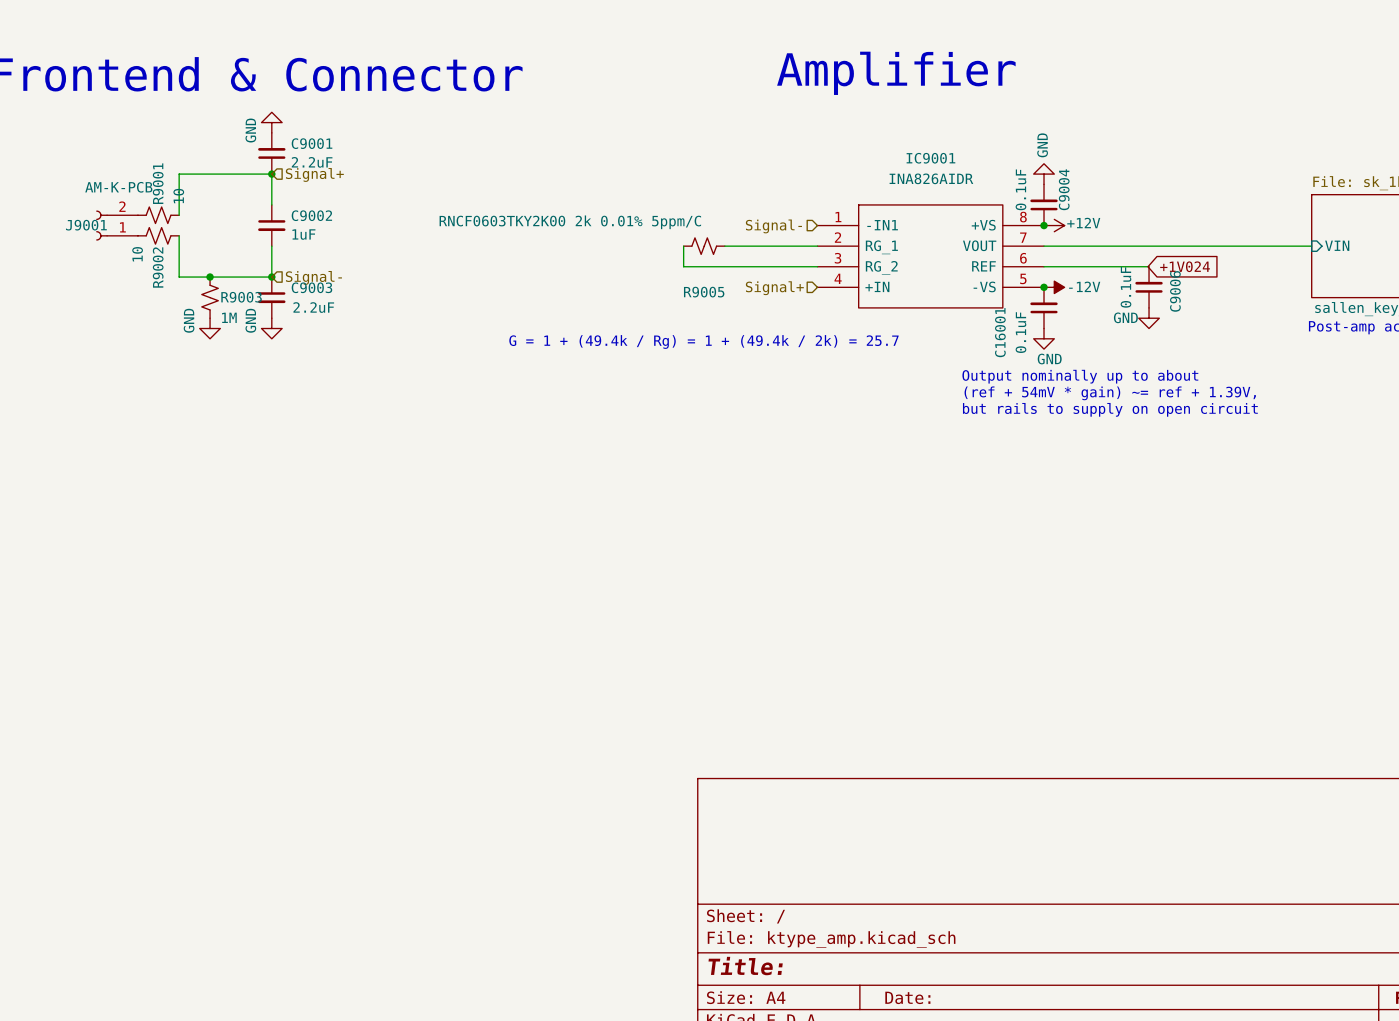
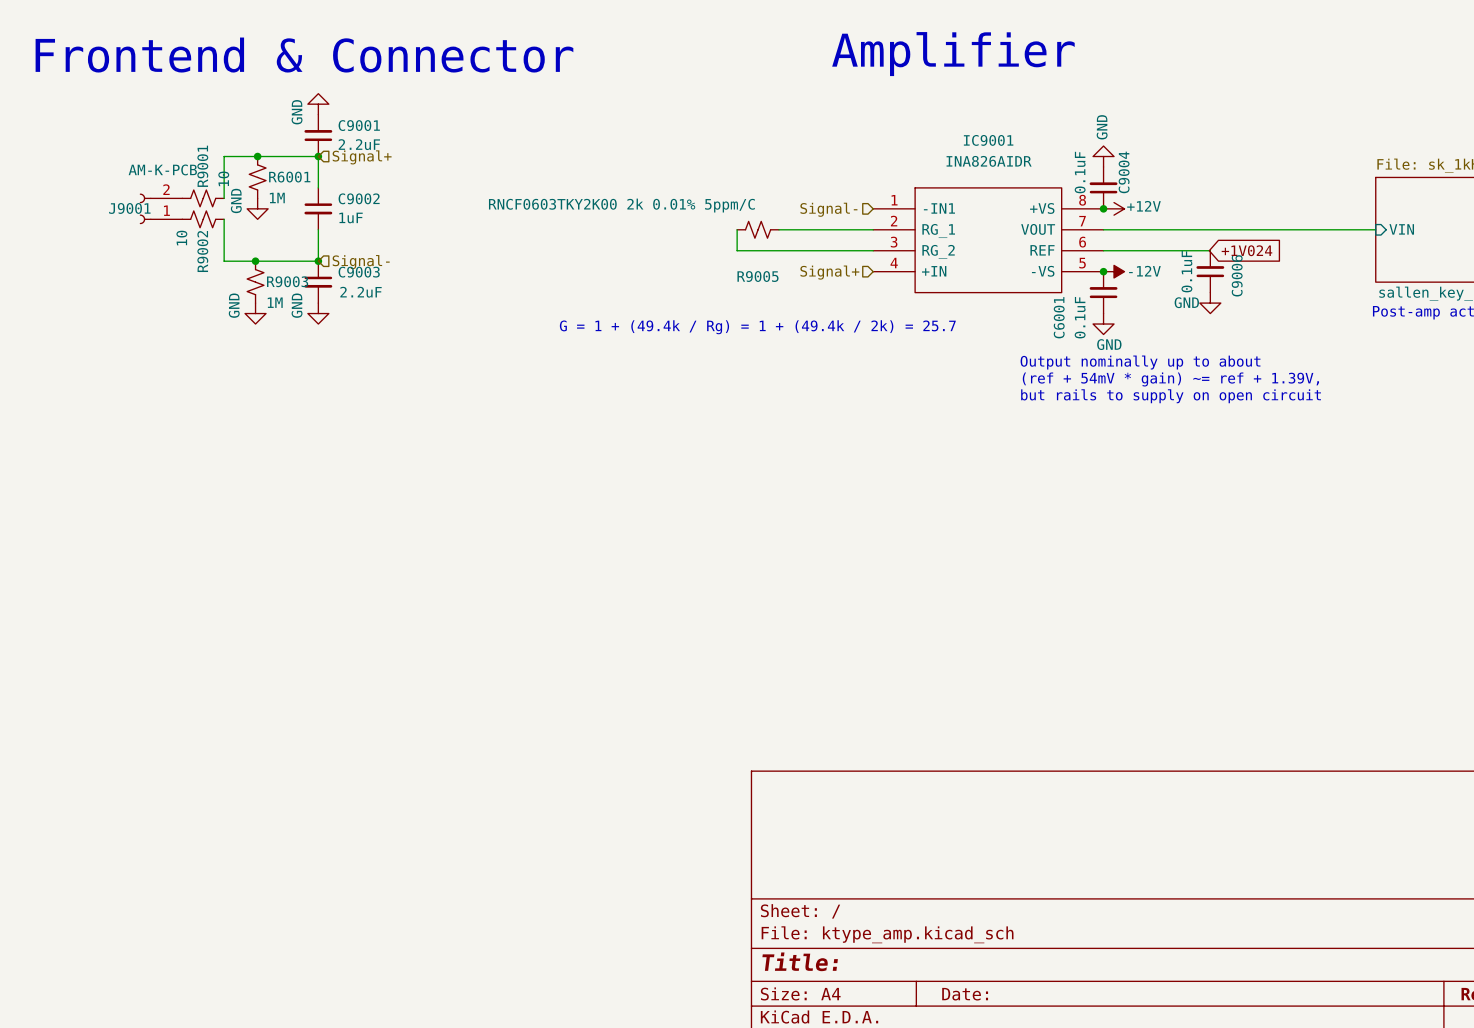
junction: none -> (257, 156)
R6001: none -> 1M (257, 177)
power symbol: none -> GND (257, 208)
C16001 name: C16001 (1000, 332) -> C6001 (1059, 317)

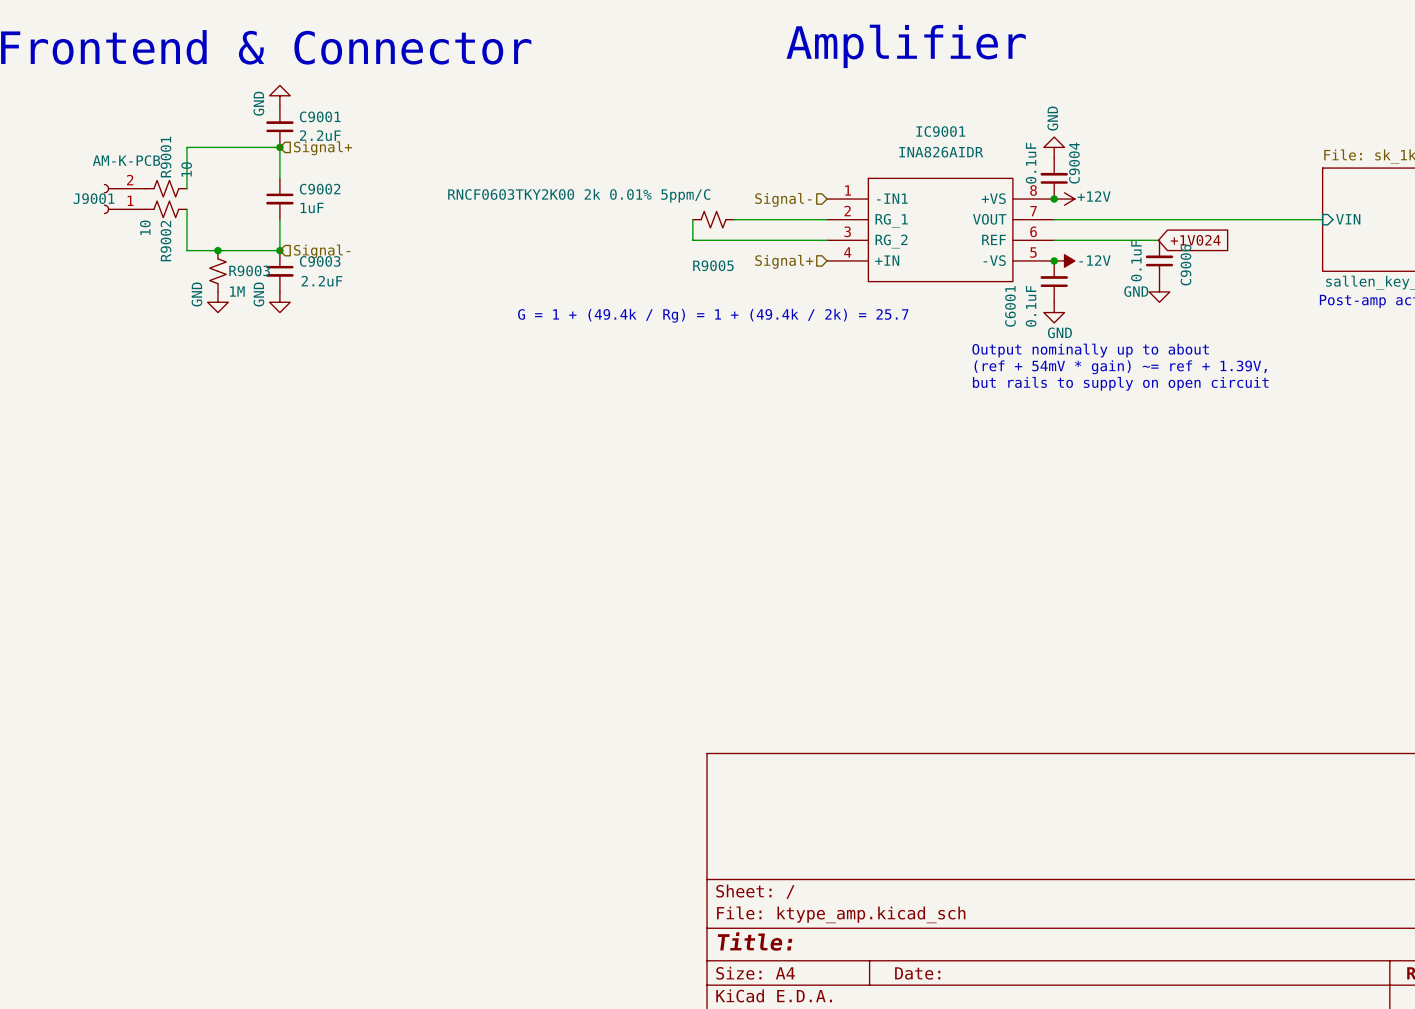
junction: (257, 156) -> none
R6001: 1M (257, 177) -> none
power symbol: GND (257, 208) -> none

